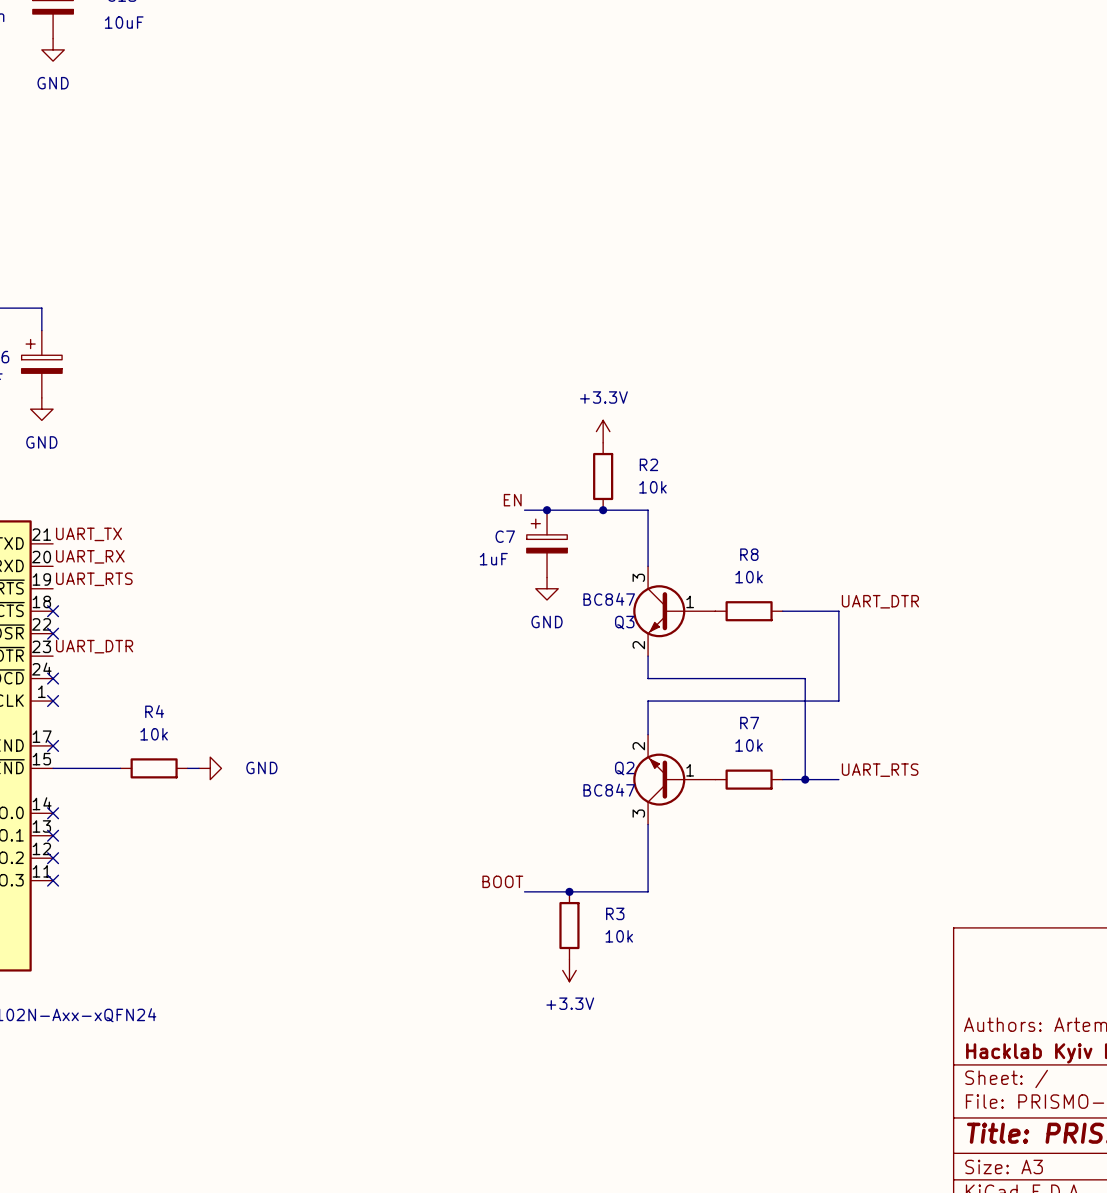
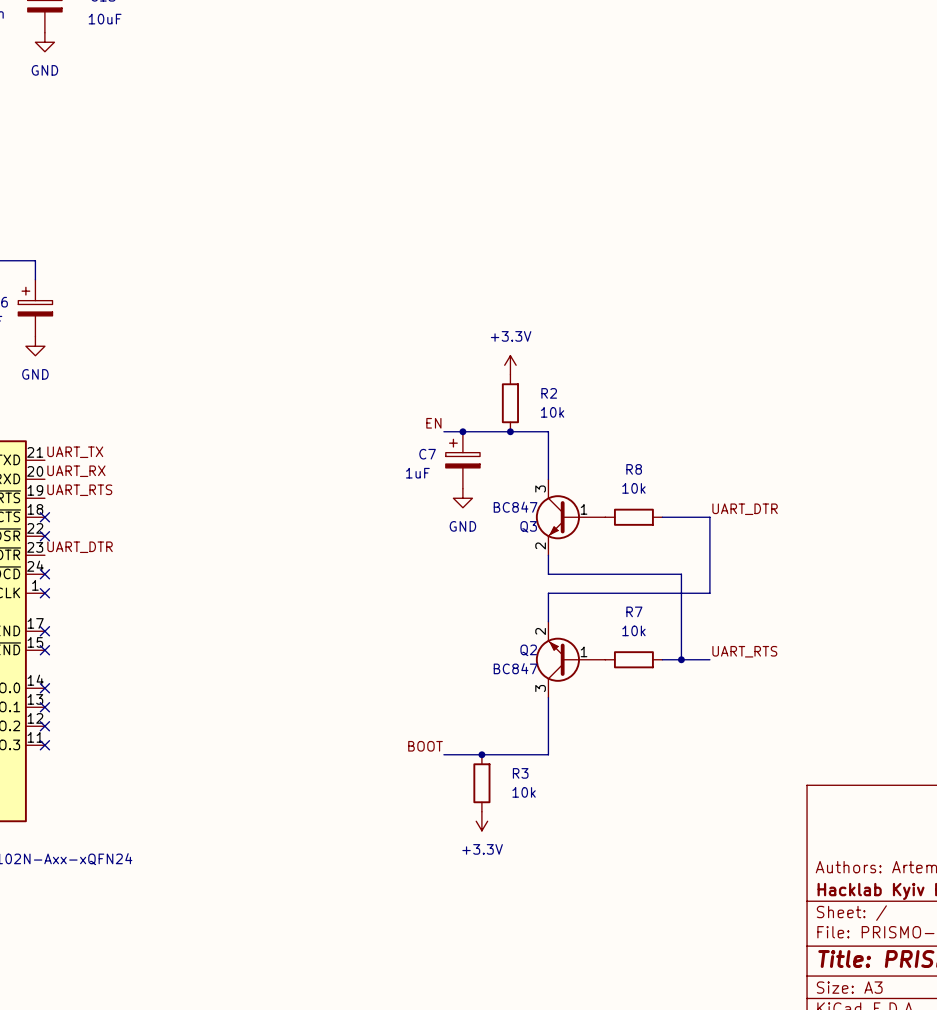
wire: (53, 768) (120, 768) -> none
no-connect mark: none -> (44, 650)
R4: 10k (154, 768) -> none
wire: (187, 768) (199, 768) -> none
power symbol: GND (210, 768) -> none

